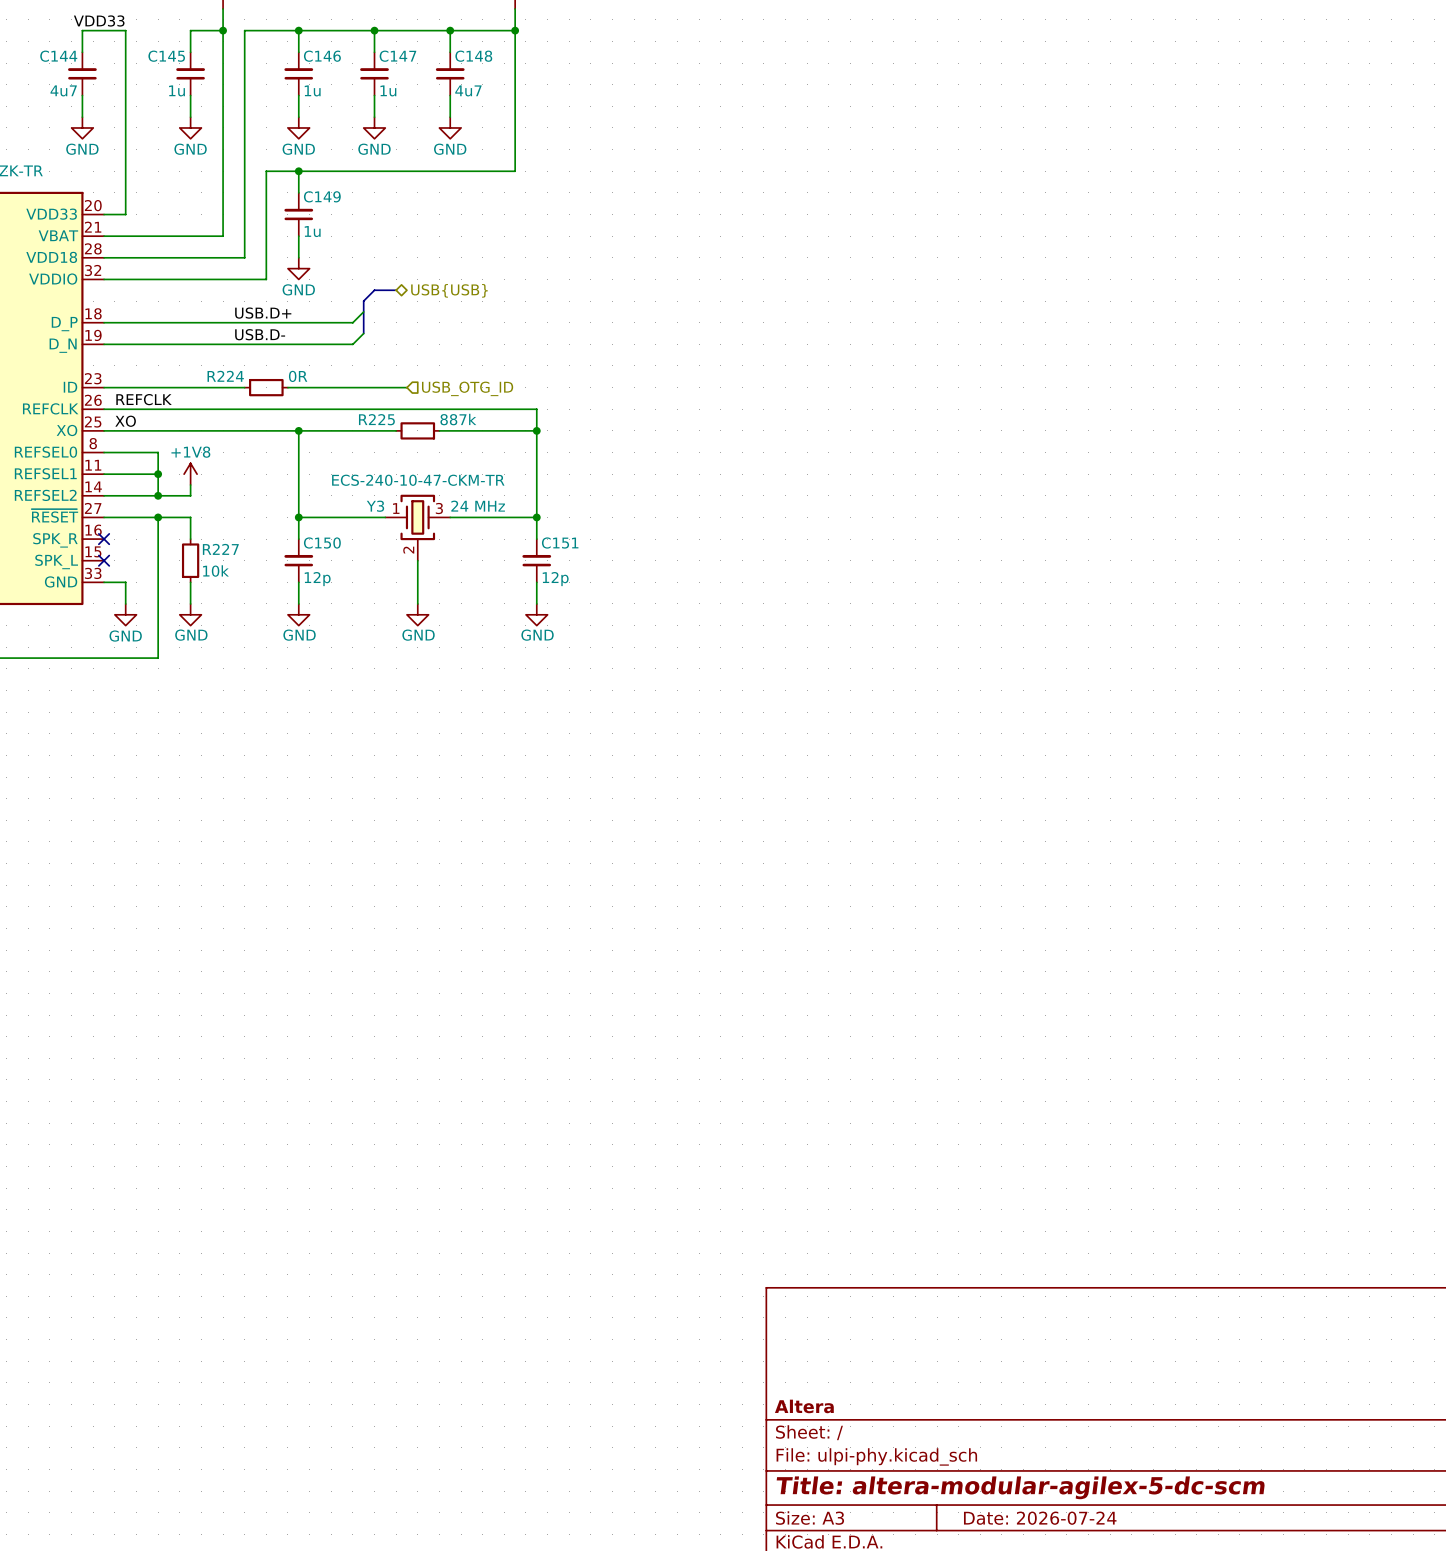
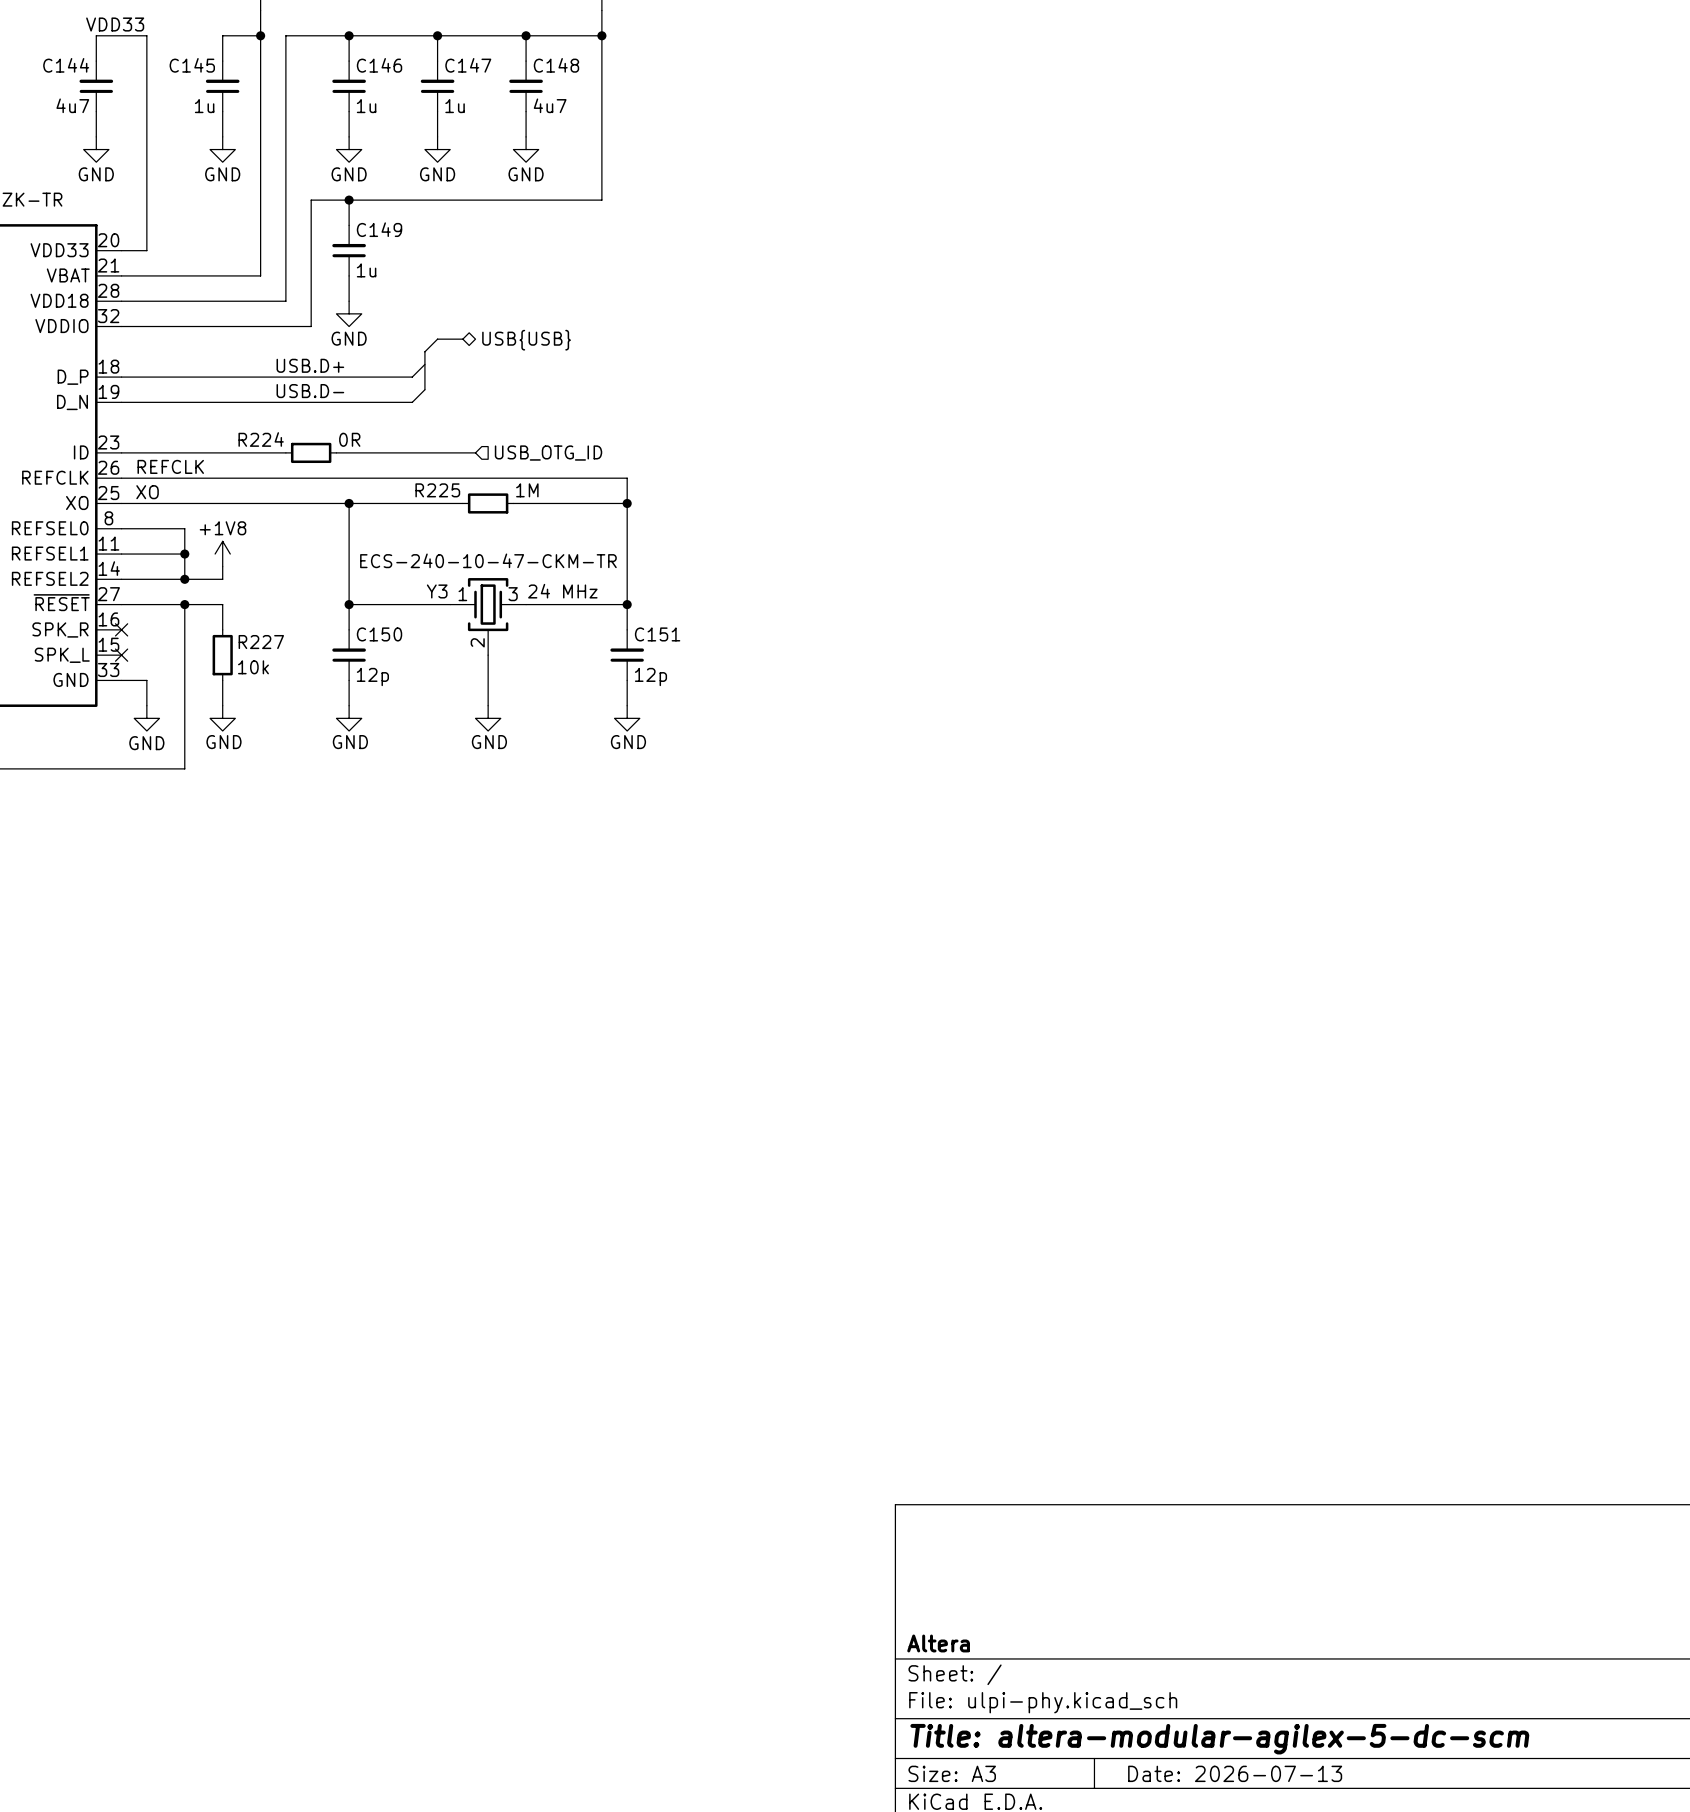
R225 text: 887k (458, 419) -> 1M (527, 490)
title block: Date: 2026-07-24 (1040, 1518) -> Date: 2026-07-13 (1235, 1773)

